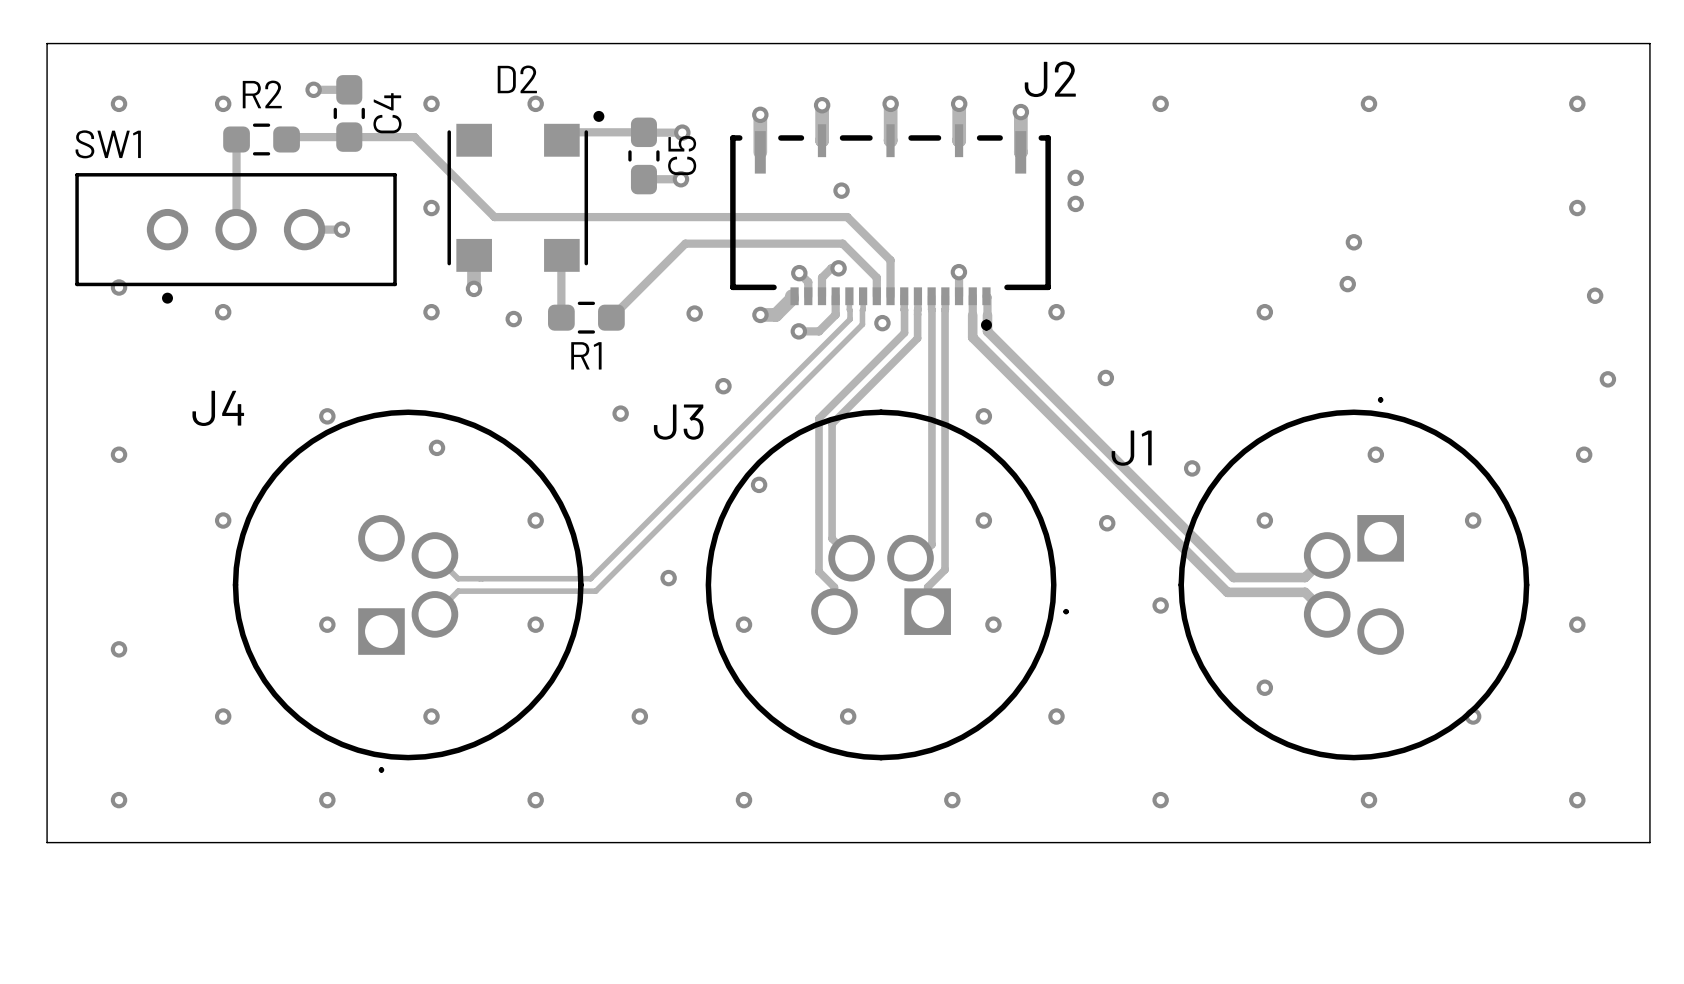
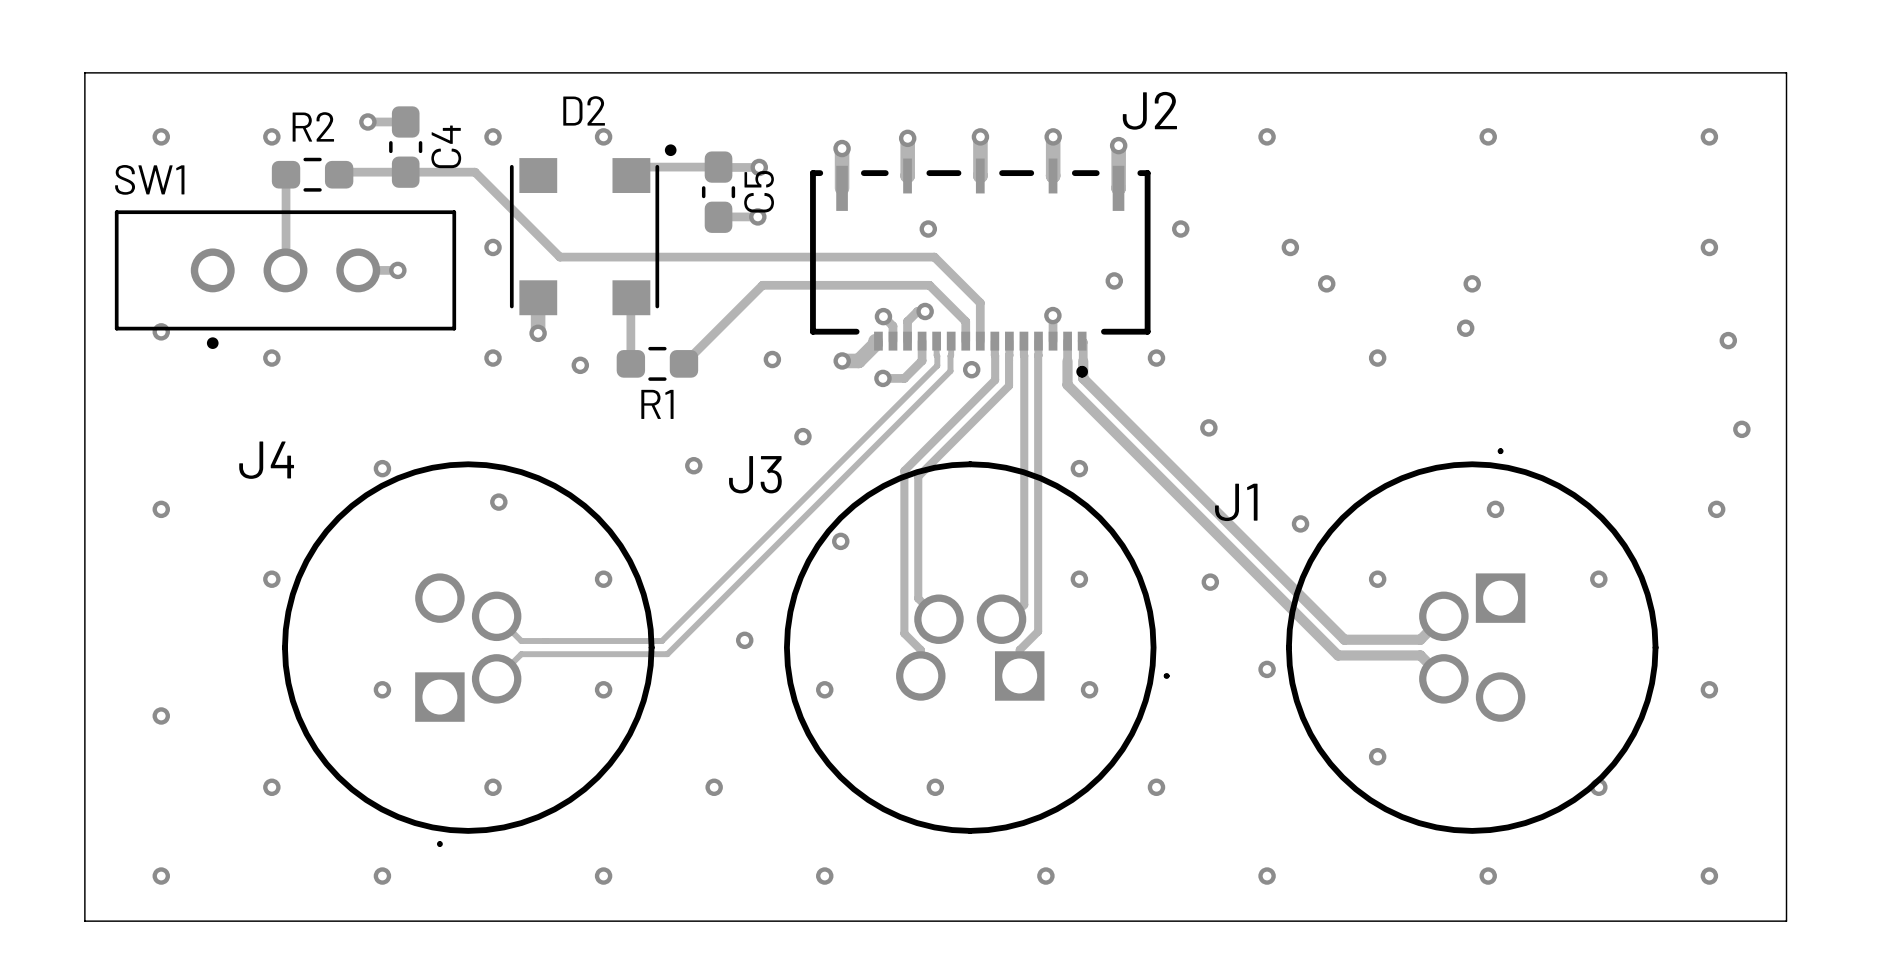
via: (1075, 177) -> none
via: none -> (1180, 229)
via: (1075, 203) -> none
via: none -> (1290, 247)
via: none -> (1114, 280)
via: none -> (1326, 283)

